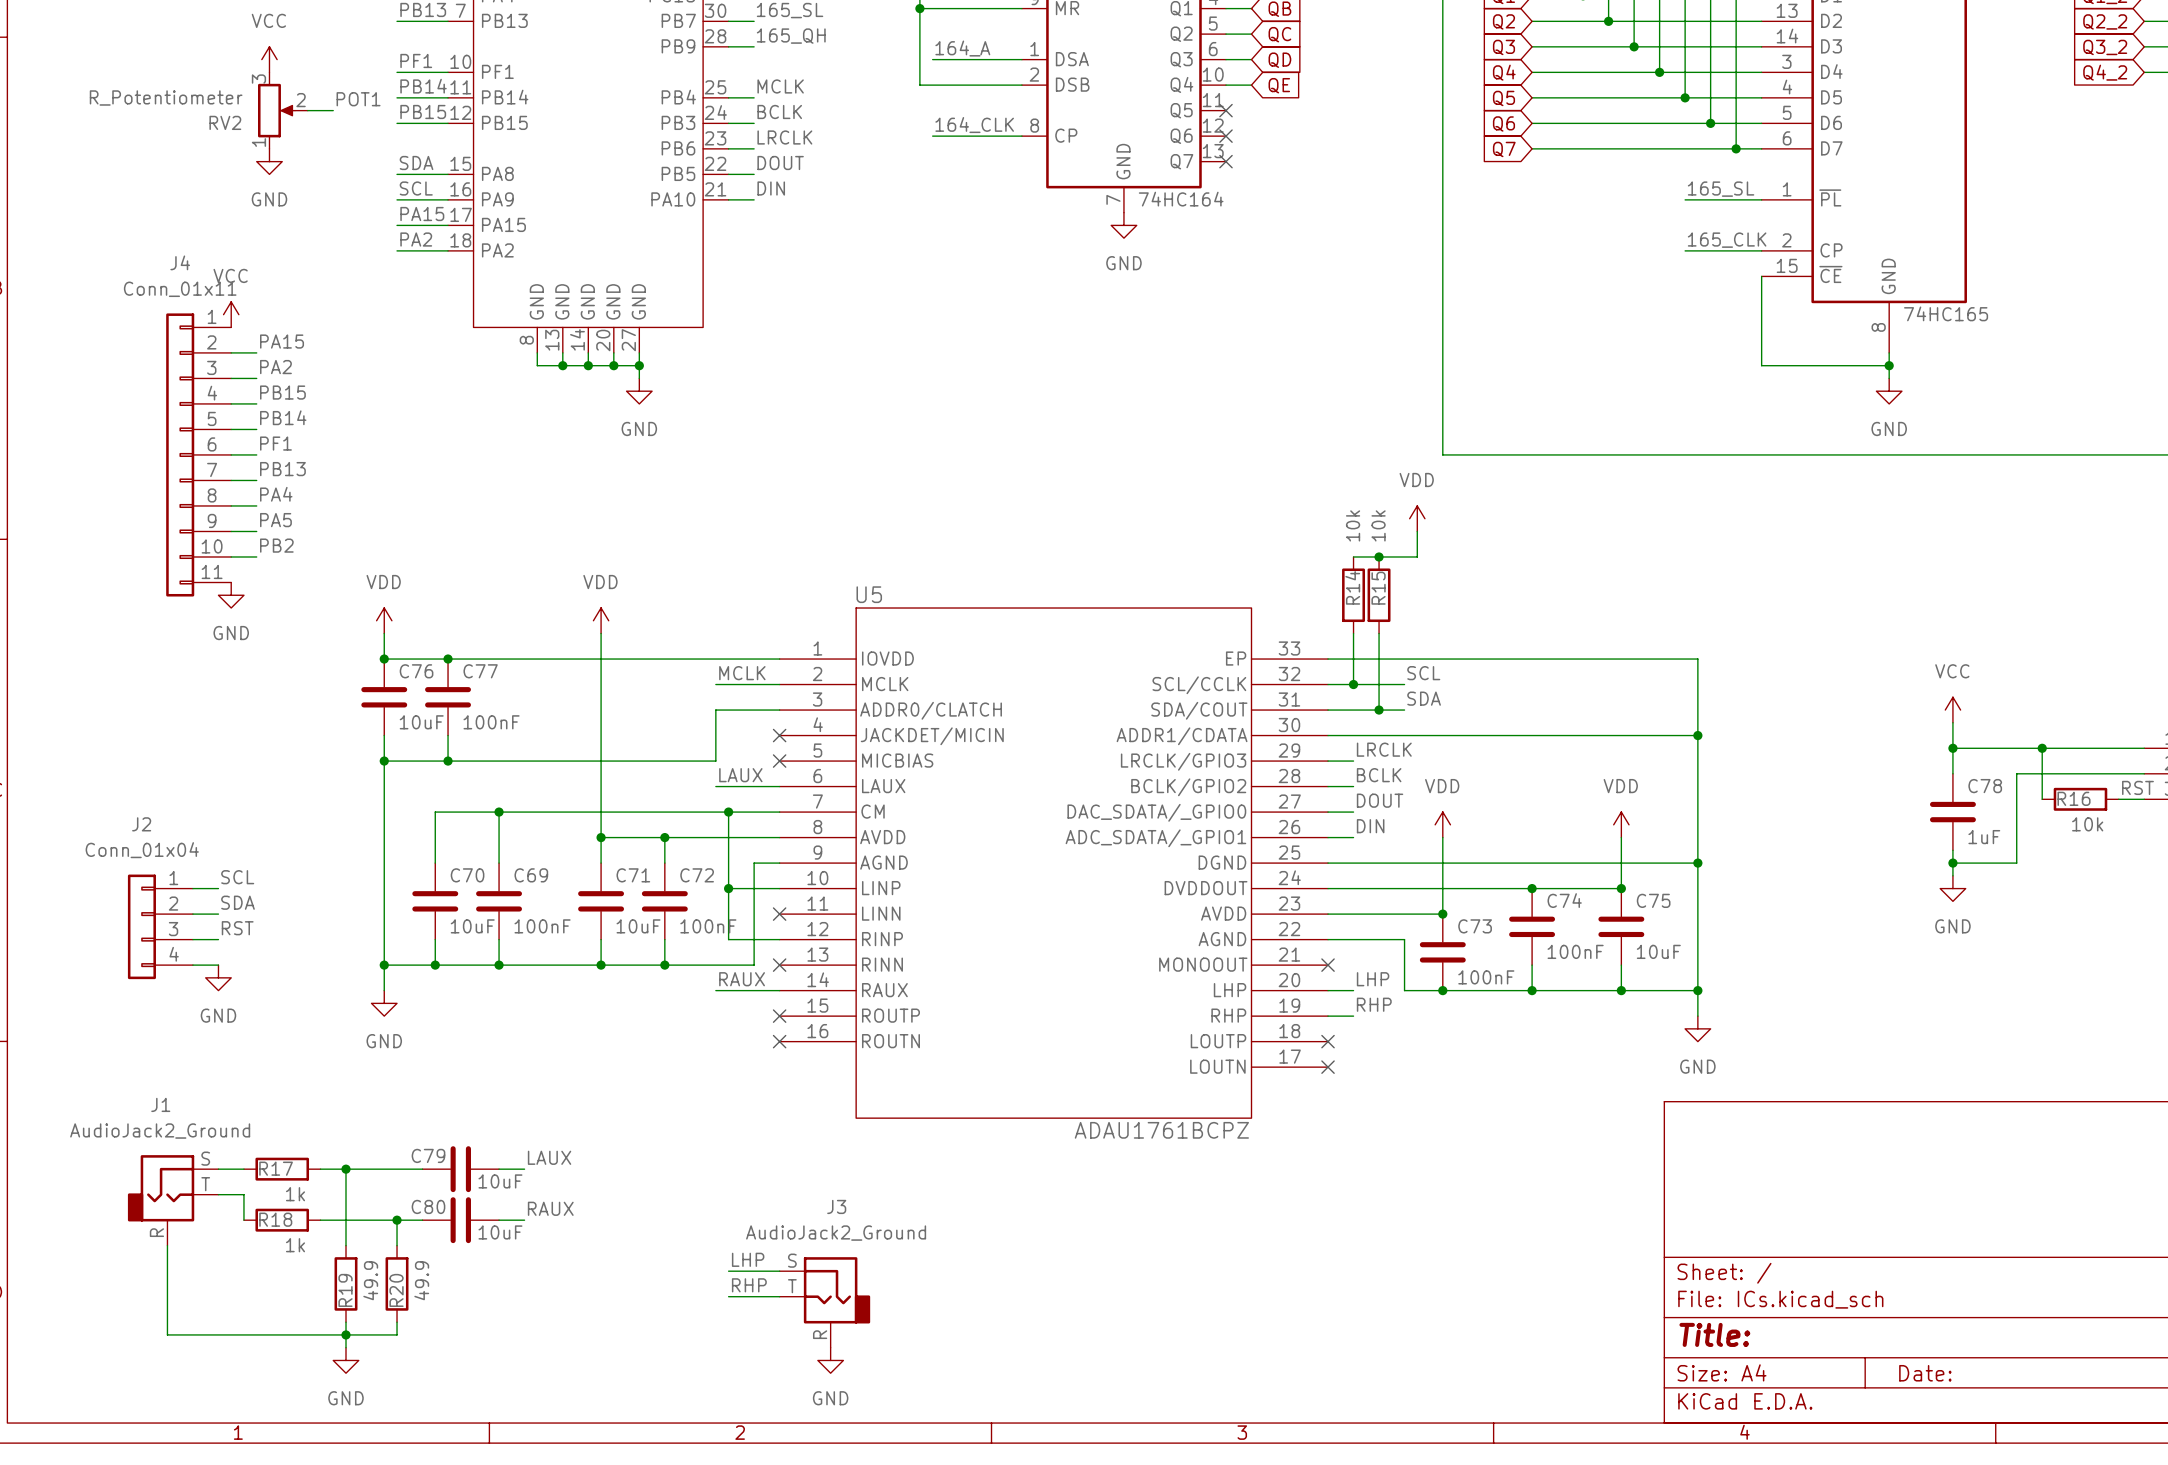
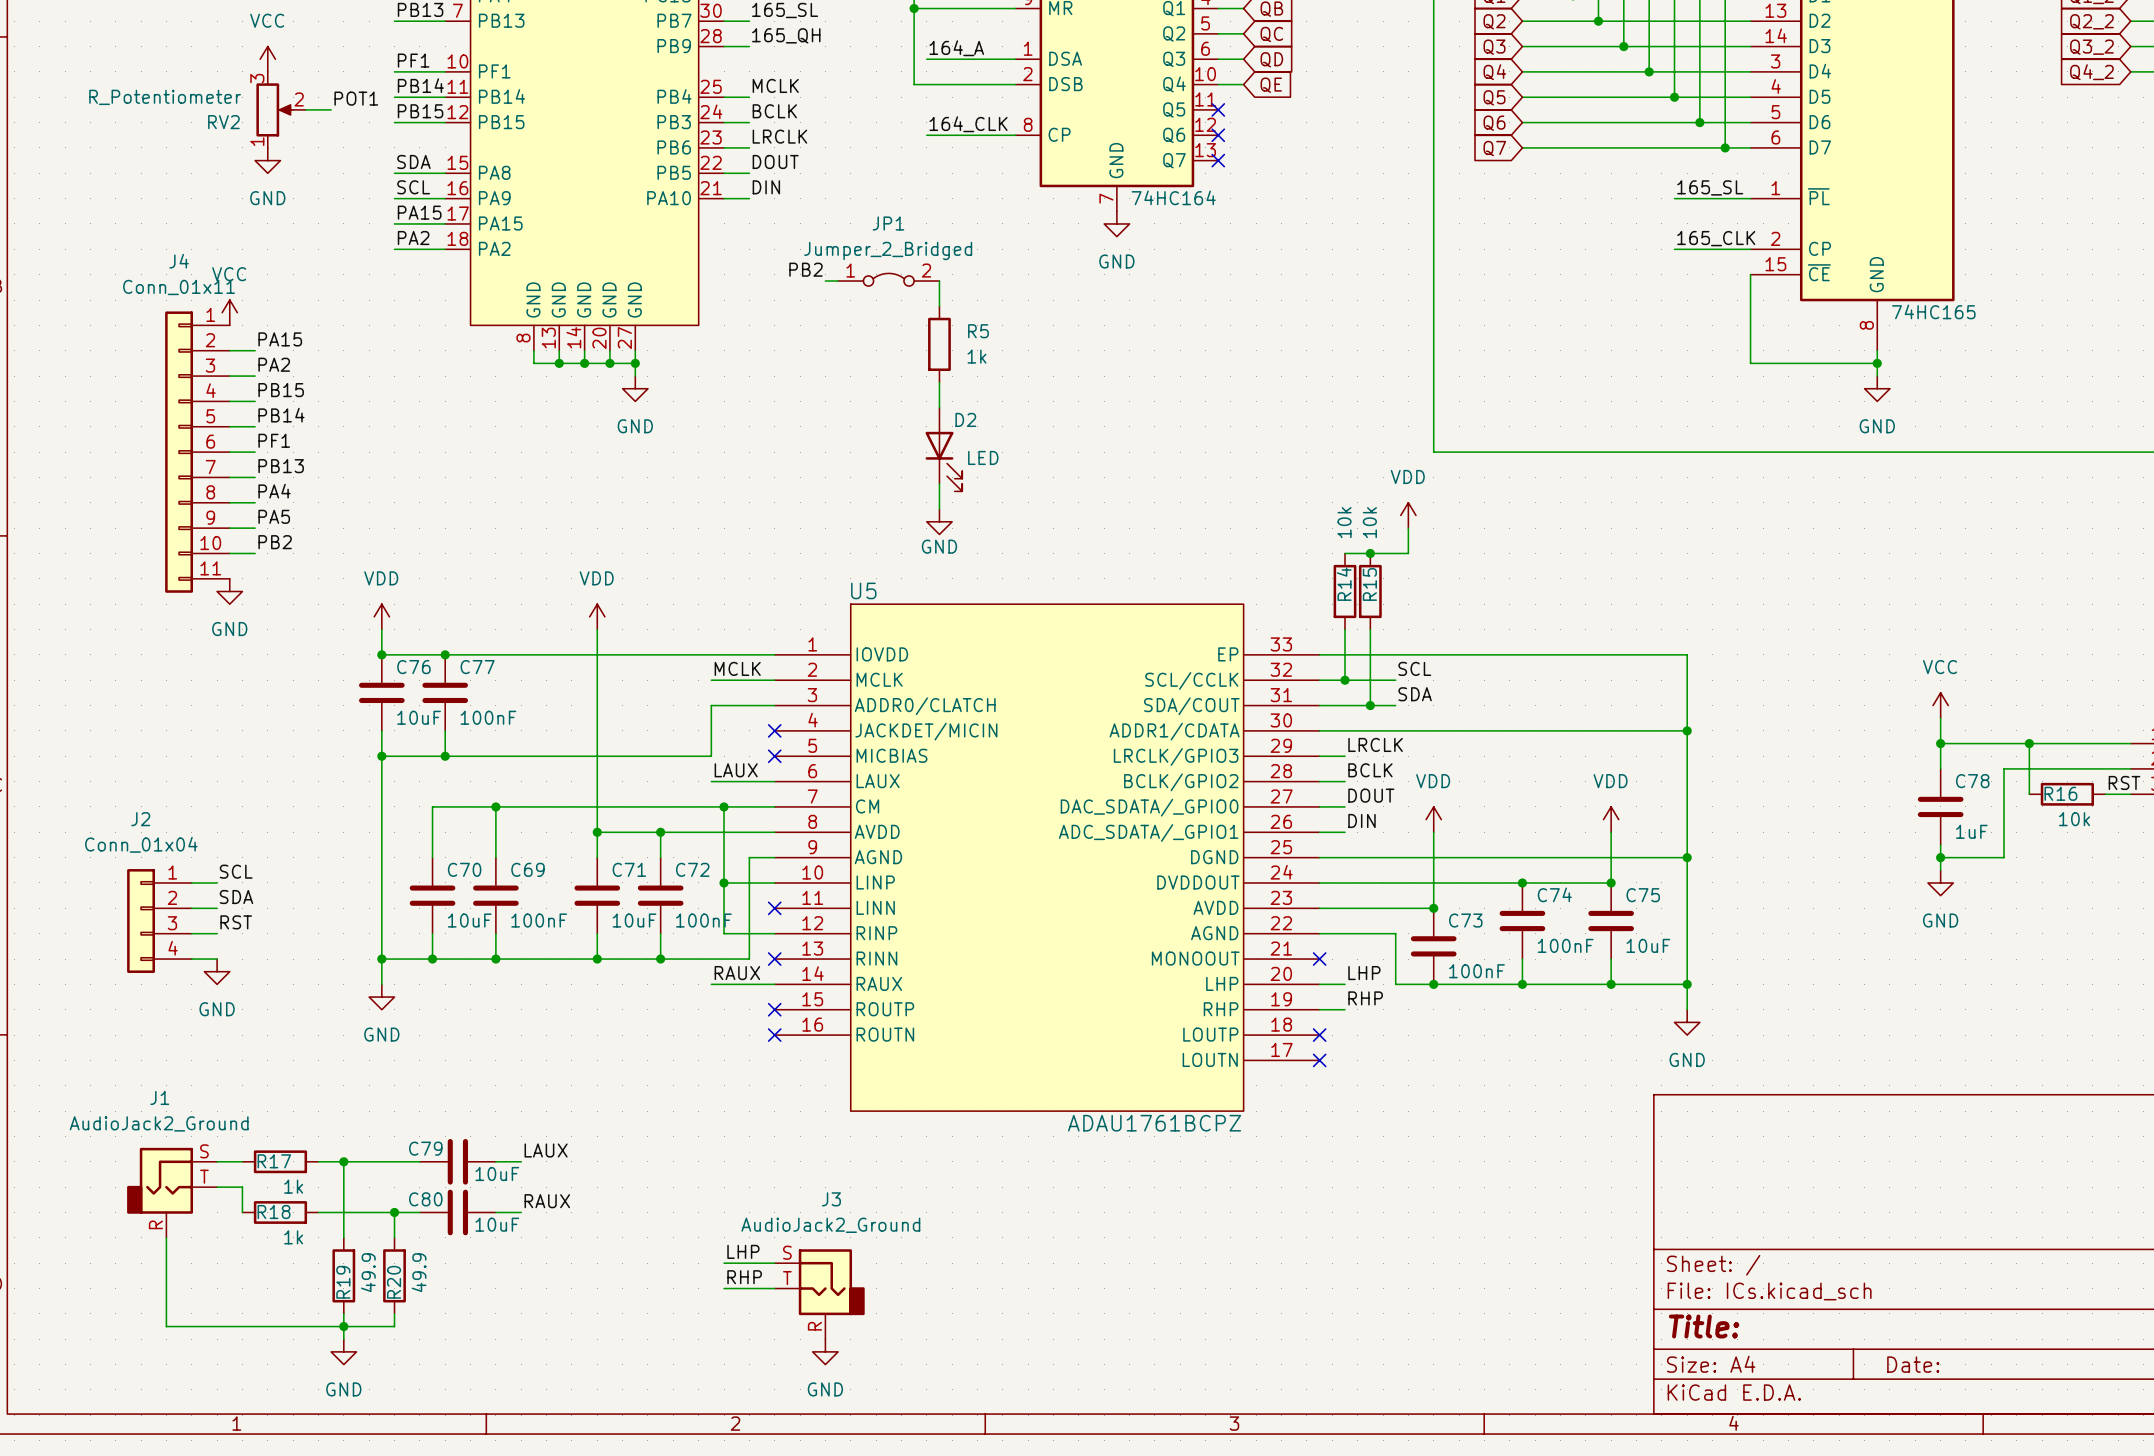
label: none -> PB2 (805, 269)
JP1: none -> Jumper_2_Bridged (888, 279)
wire: none -> (825, 281) (838, 281)
wire: none -> (939, 281) (939, 306)
R5: none -> 1k (939, 344)
wire: none -> (939, 382) (939, 407)
D2: none -> LED (943, 449)
wire: none -> (939, 483) (939, 509)
power symbol: none -> GND (939, 521)

